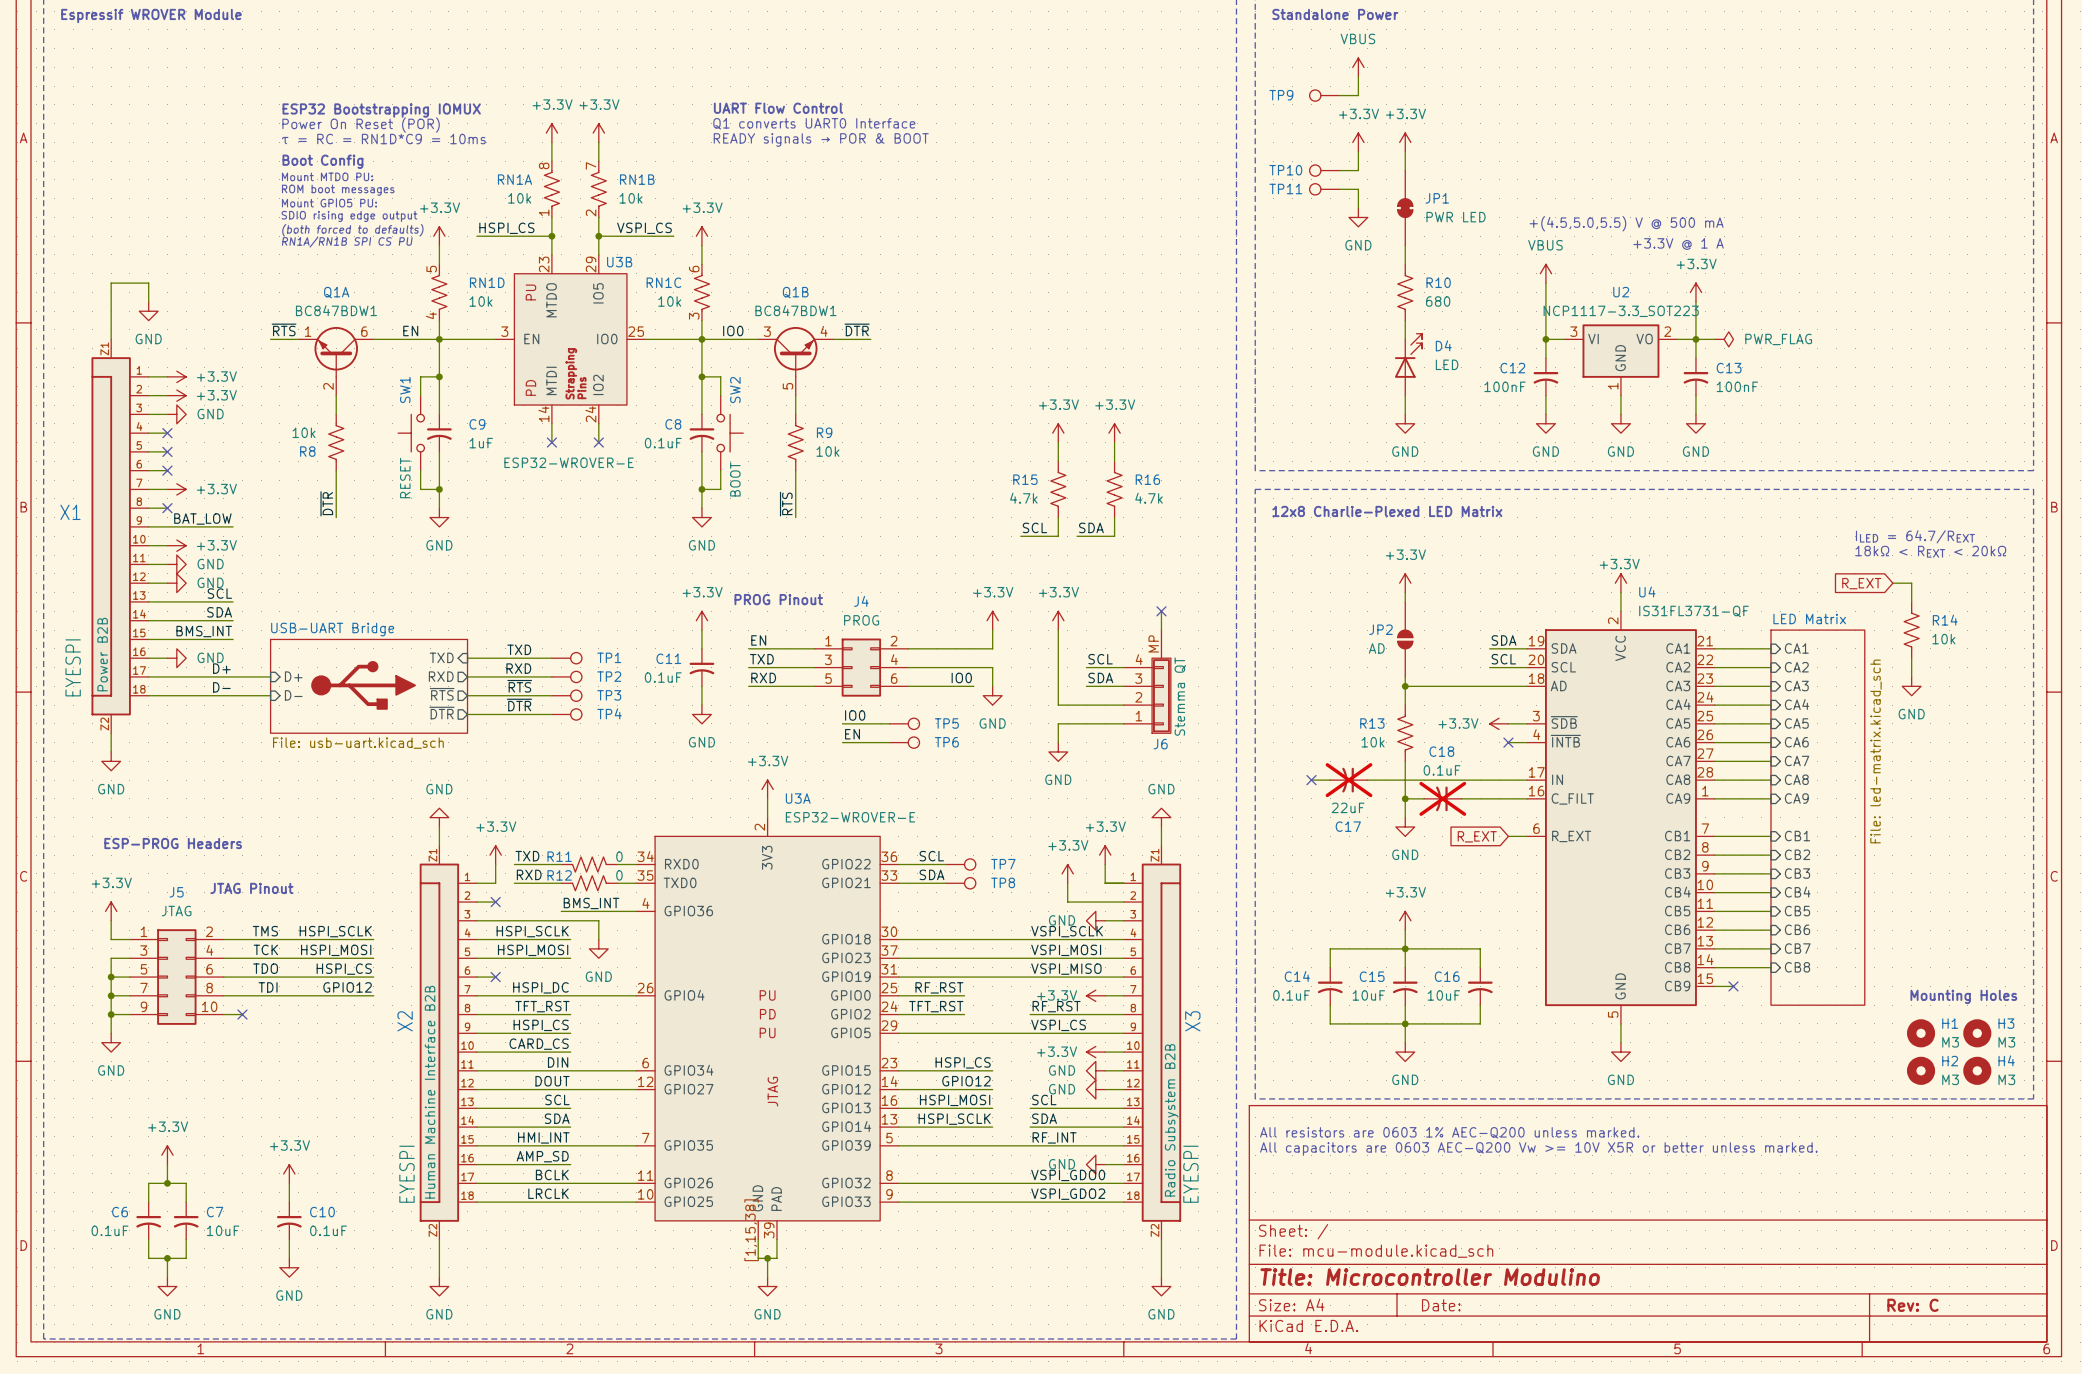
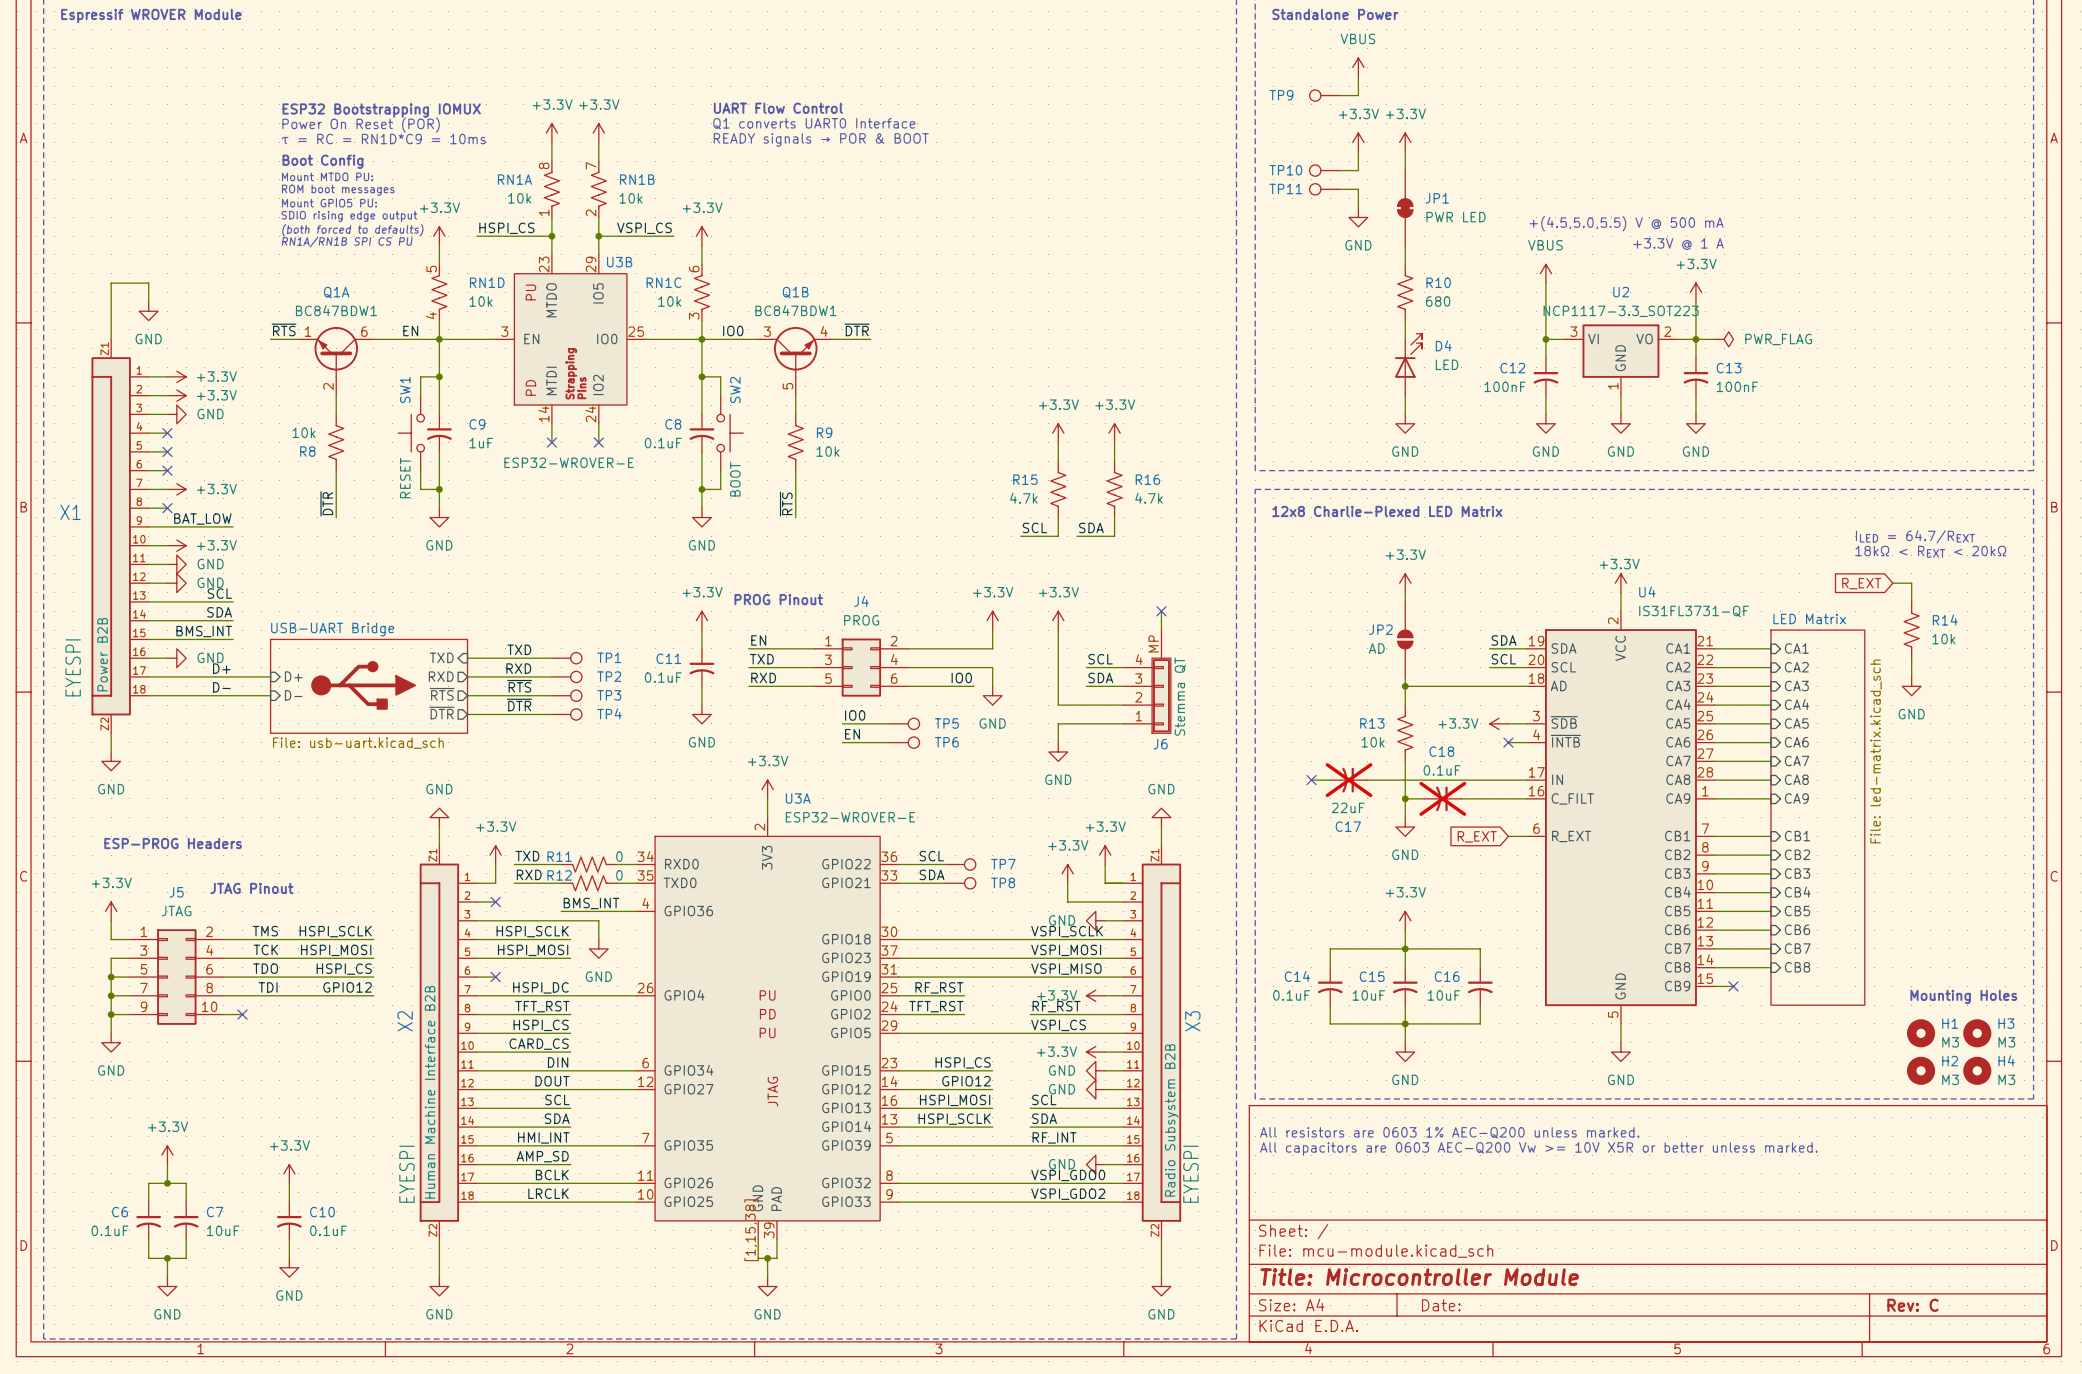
title block: Title: Microcontroller Modulino (1430, 1277) -> Title: Microcontroller Module (1419, 1277)

